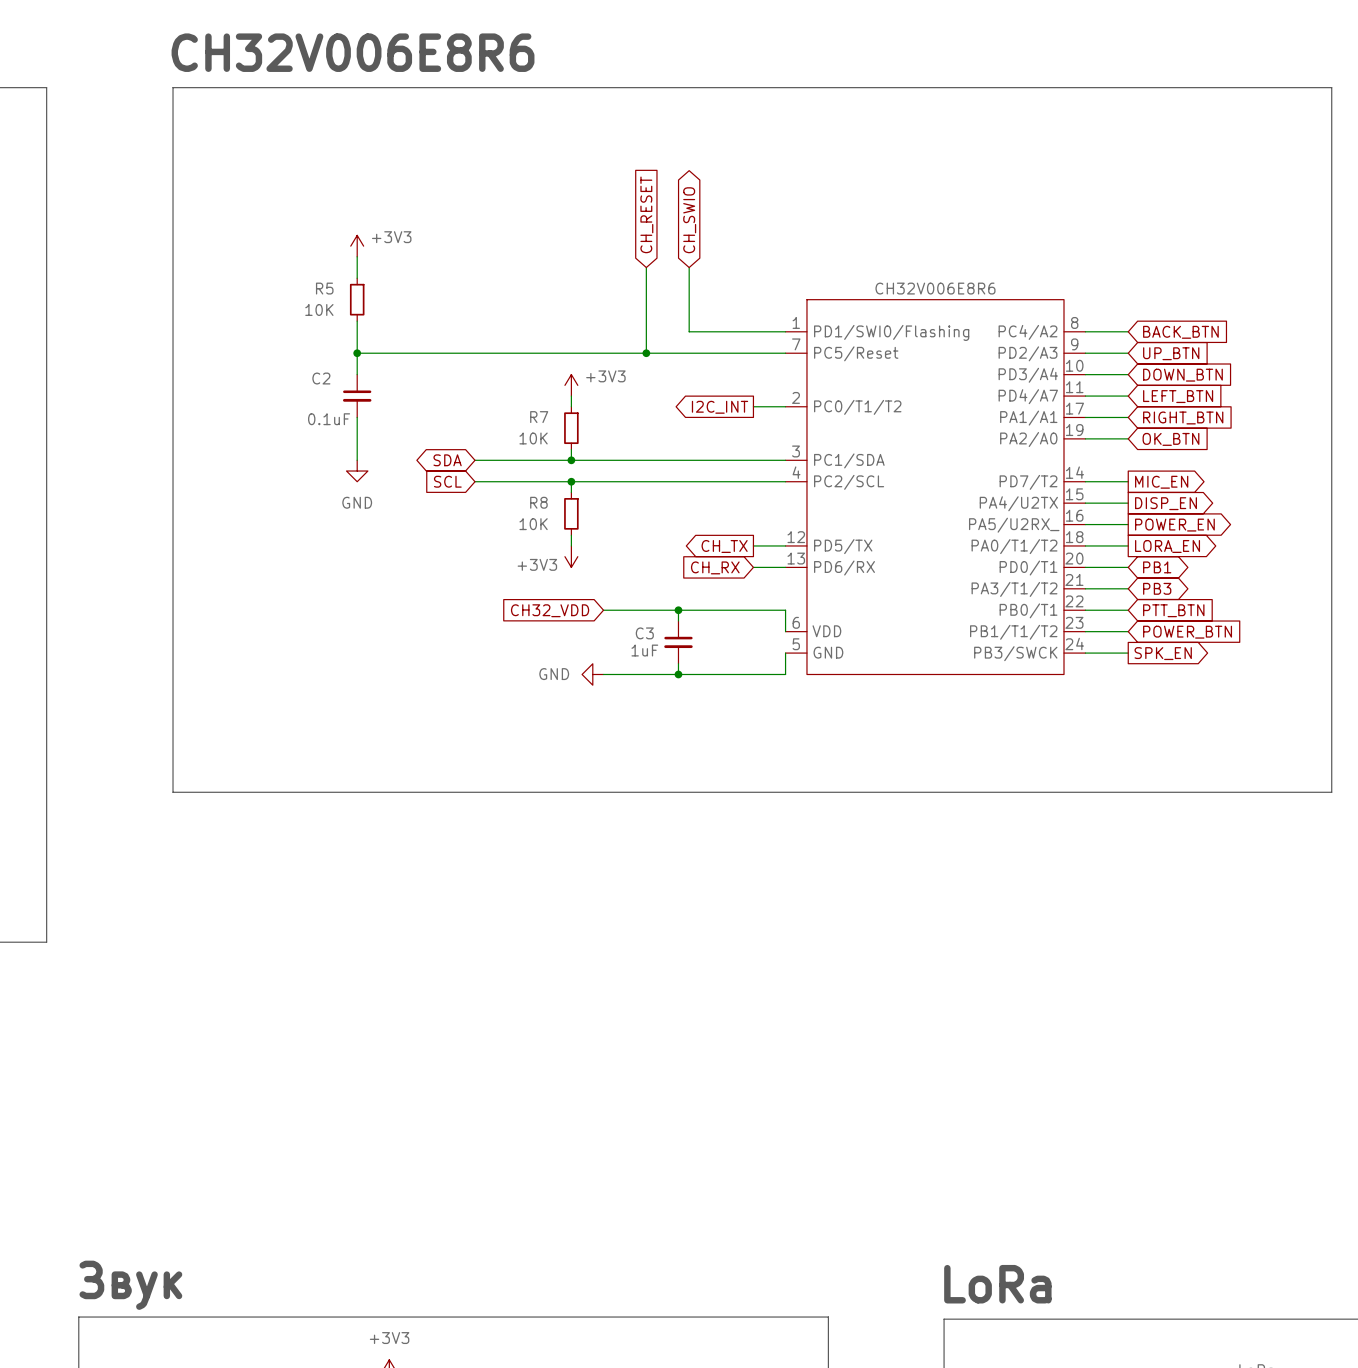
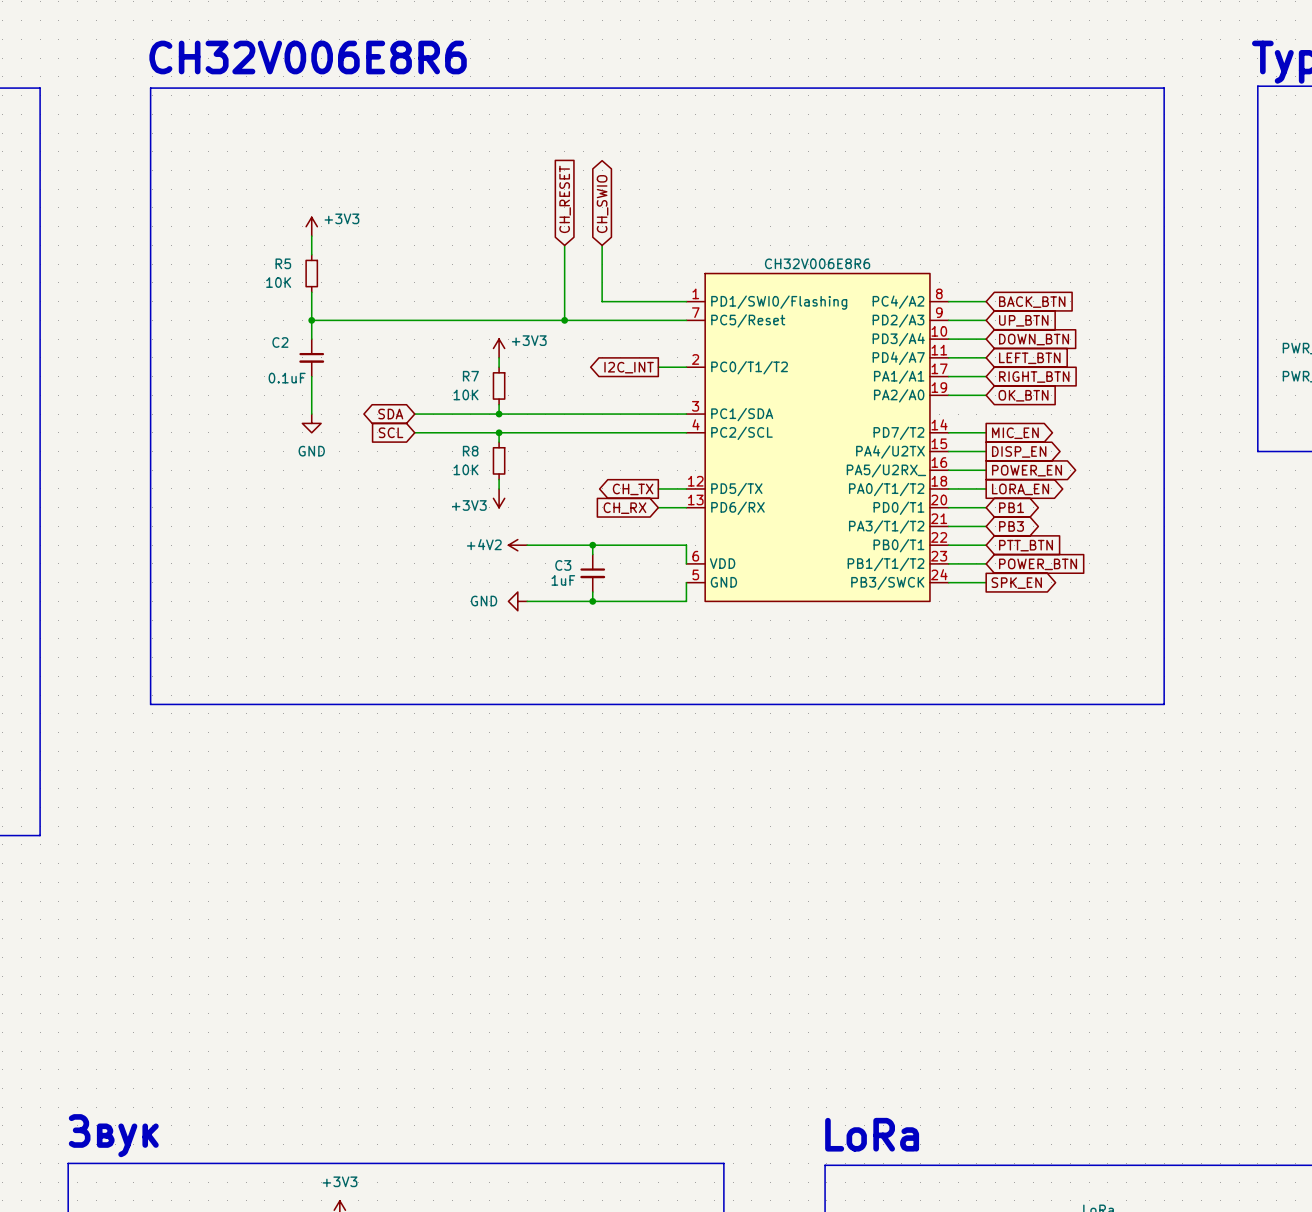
global label: CH32_VDD (550, 610) -> none
power symbol: none -> +4V2 (517, 545)

